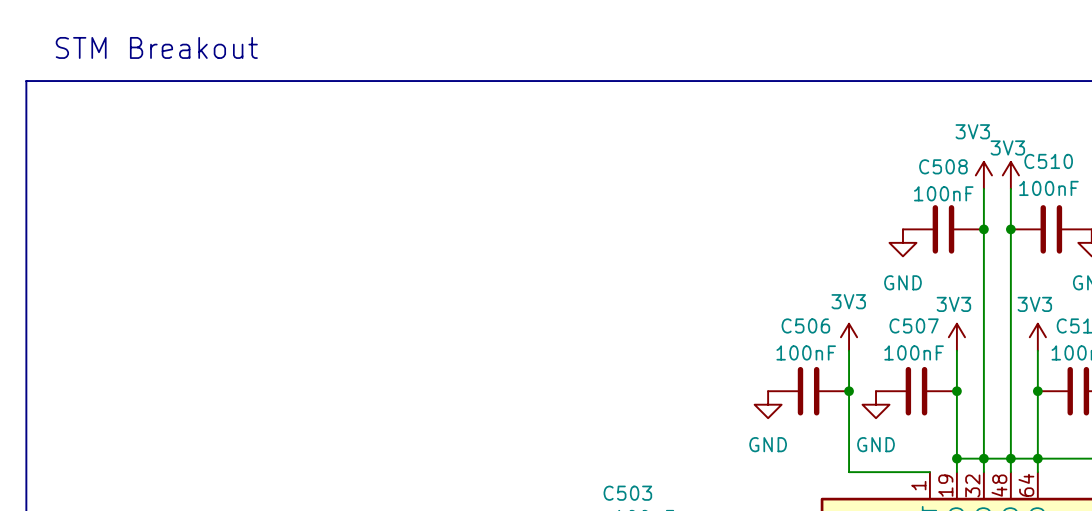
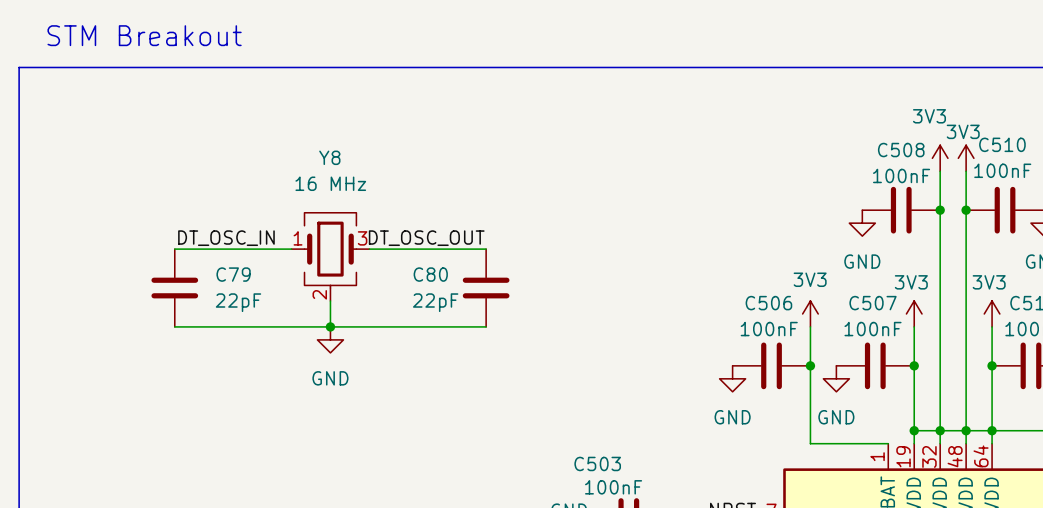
label: none -> DT_OSC_IN (226, 238)
label: none -> DT_OSC_OUT (426, 238)
wire: none -> (174, 249) (291, 249)
wire: none -> (369, 249) (486, 249)
Y8: none -> 16 MHz (330, 256)
C79: none -> 22pF (174, 288)
C80: none -> 22pF (486, 288)
wire: none -> (330, 300) (330, 326)
wire: none -> (174, 326) (486, 326)
junction: none -> (330, 326)
power symbol: none -> GND (330, 339)

